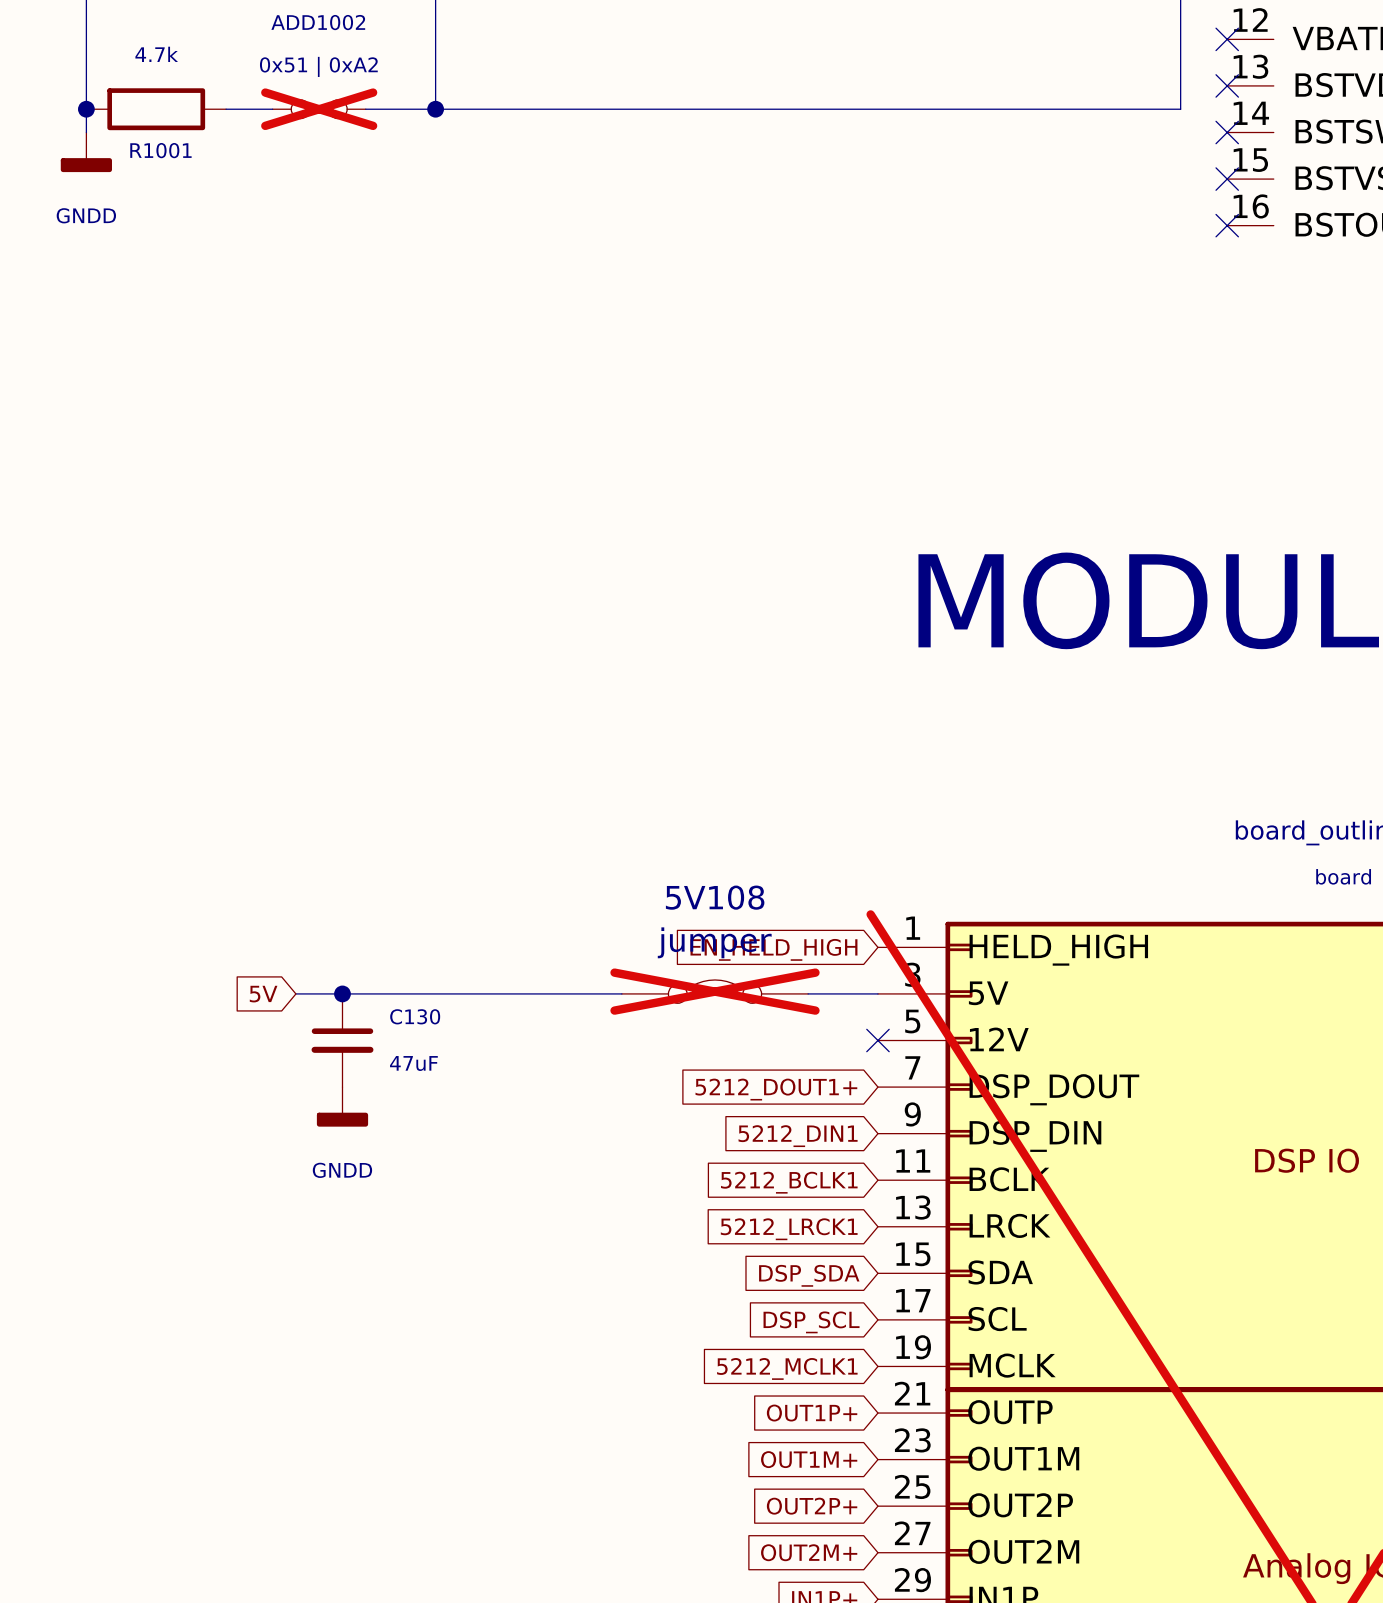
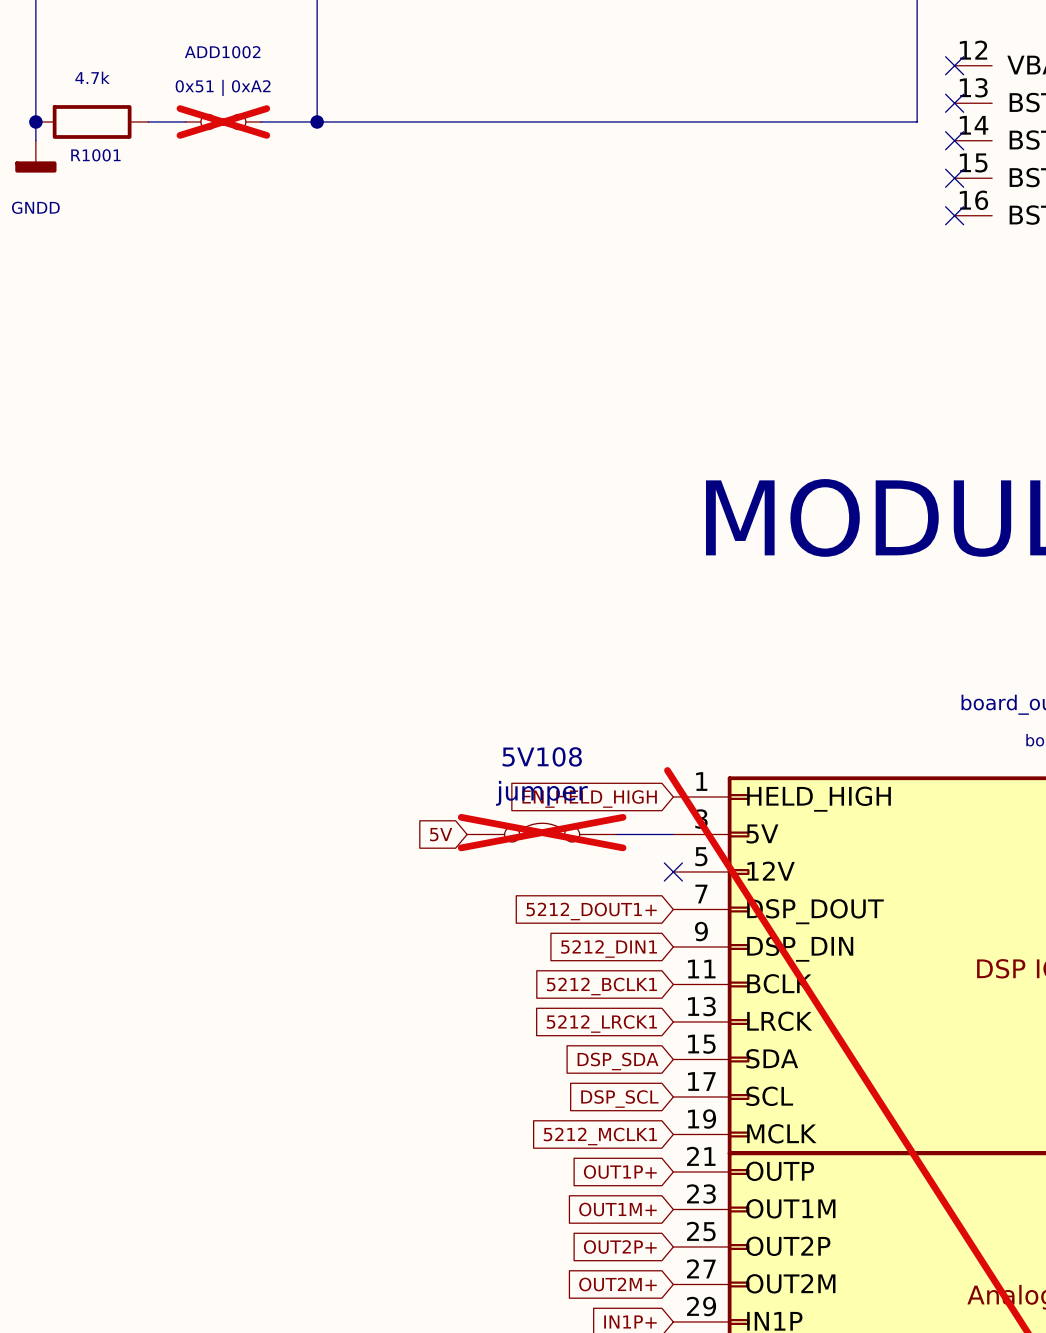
wire: (295, 993) (621, 993) -> none
junction: (342, 993) -> none
global label position: 5V (263, 994) -> 5V (441, 834)
C130: 47uF (342, 1040) -> none
power symbol: GNDD (342, 1106) -> none

